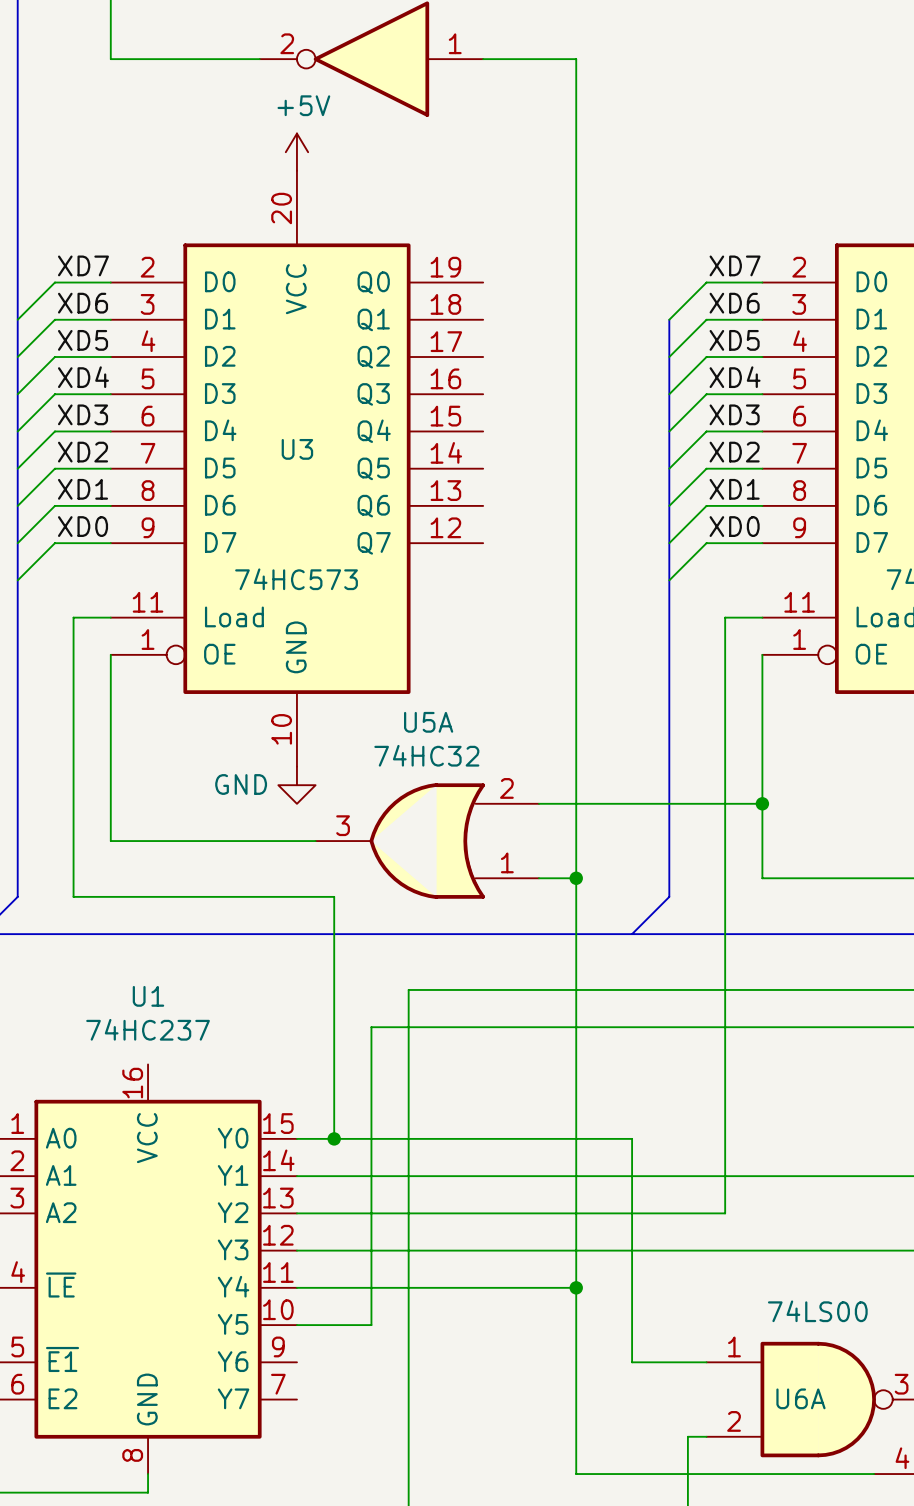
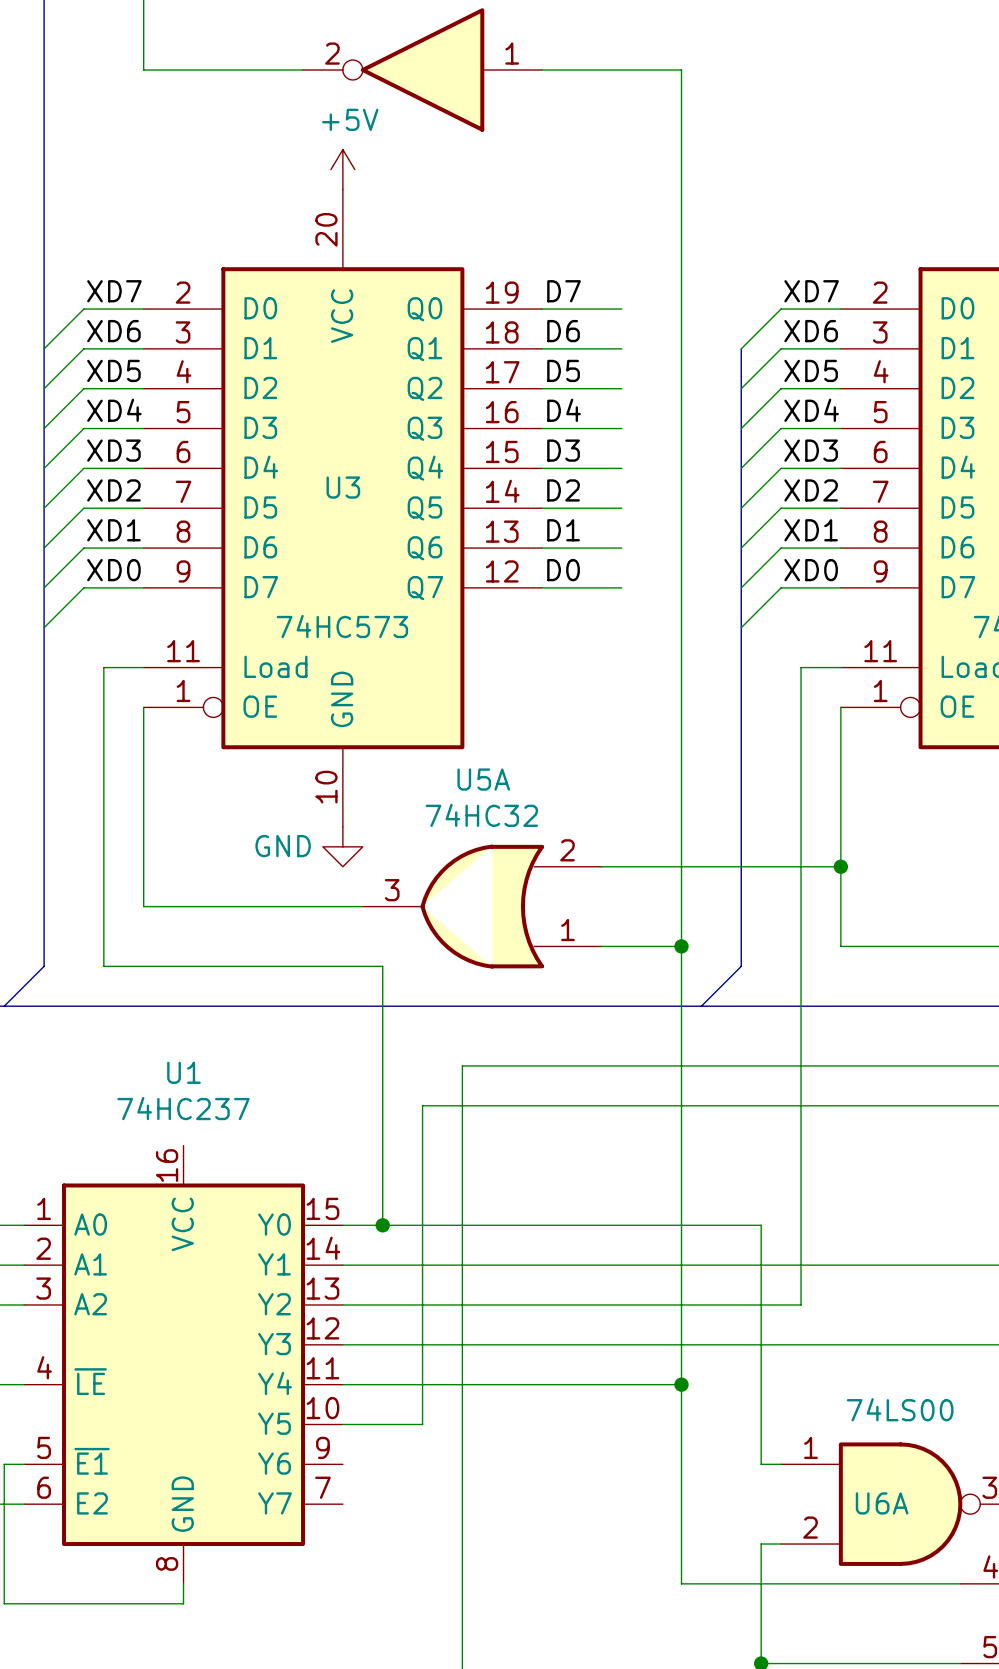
wire: (576, 59) (576, 1474) (613, 1474) -> (641, 70) (681, 70) (681, 1583)
label: none -> D7 (564, 291)
wire: none -> (542, 309) (621, 309)
label: none -> D6 (563, 331)
wire: none -> (542, 348) (621, 348)
label: none -> D5 (563, 370)
wire: none -> (542, 388) (621, 388)
label: none -> D4 (564, 410)
wire: none -> (542, 428) (621, 428)
label: none -> D3 (563, 450)
wire: none -> (542, 468) (621, 468)
label: none -> D2 (563, 490)
wire: none -> (542, 508) (621, 508)
label: none -> D1 (563, 530)
wire: none -> (542, 548) (621, 548)
label: none -> D0 (563, 570)
wire: none -> (542, 587) (621, 587)
wire: none -> (641, 946) (681, 946)
junction position: (576, 878) -> (681, 946)
wire: (632, 1138) (632, 1362) (687, 1362) -> (701, 1225) (761, 1225) (761, 1464)
wire: none -> (641, 1384) (681, 1384)
junction position: (576, 1287) -> (681, 1384)

